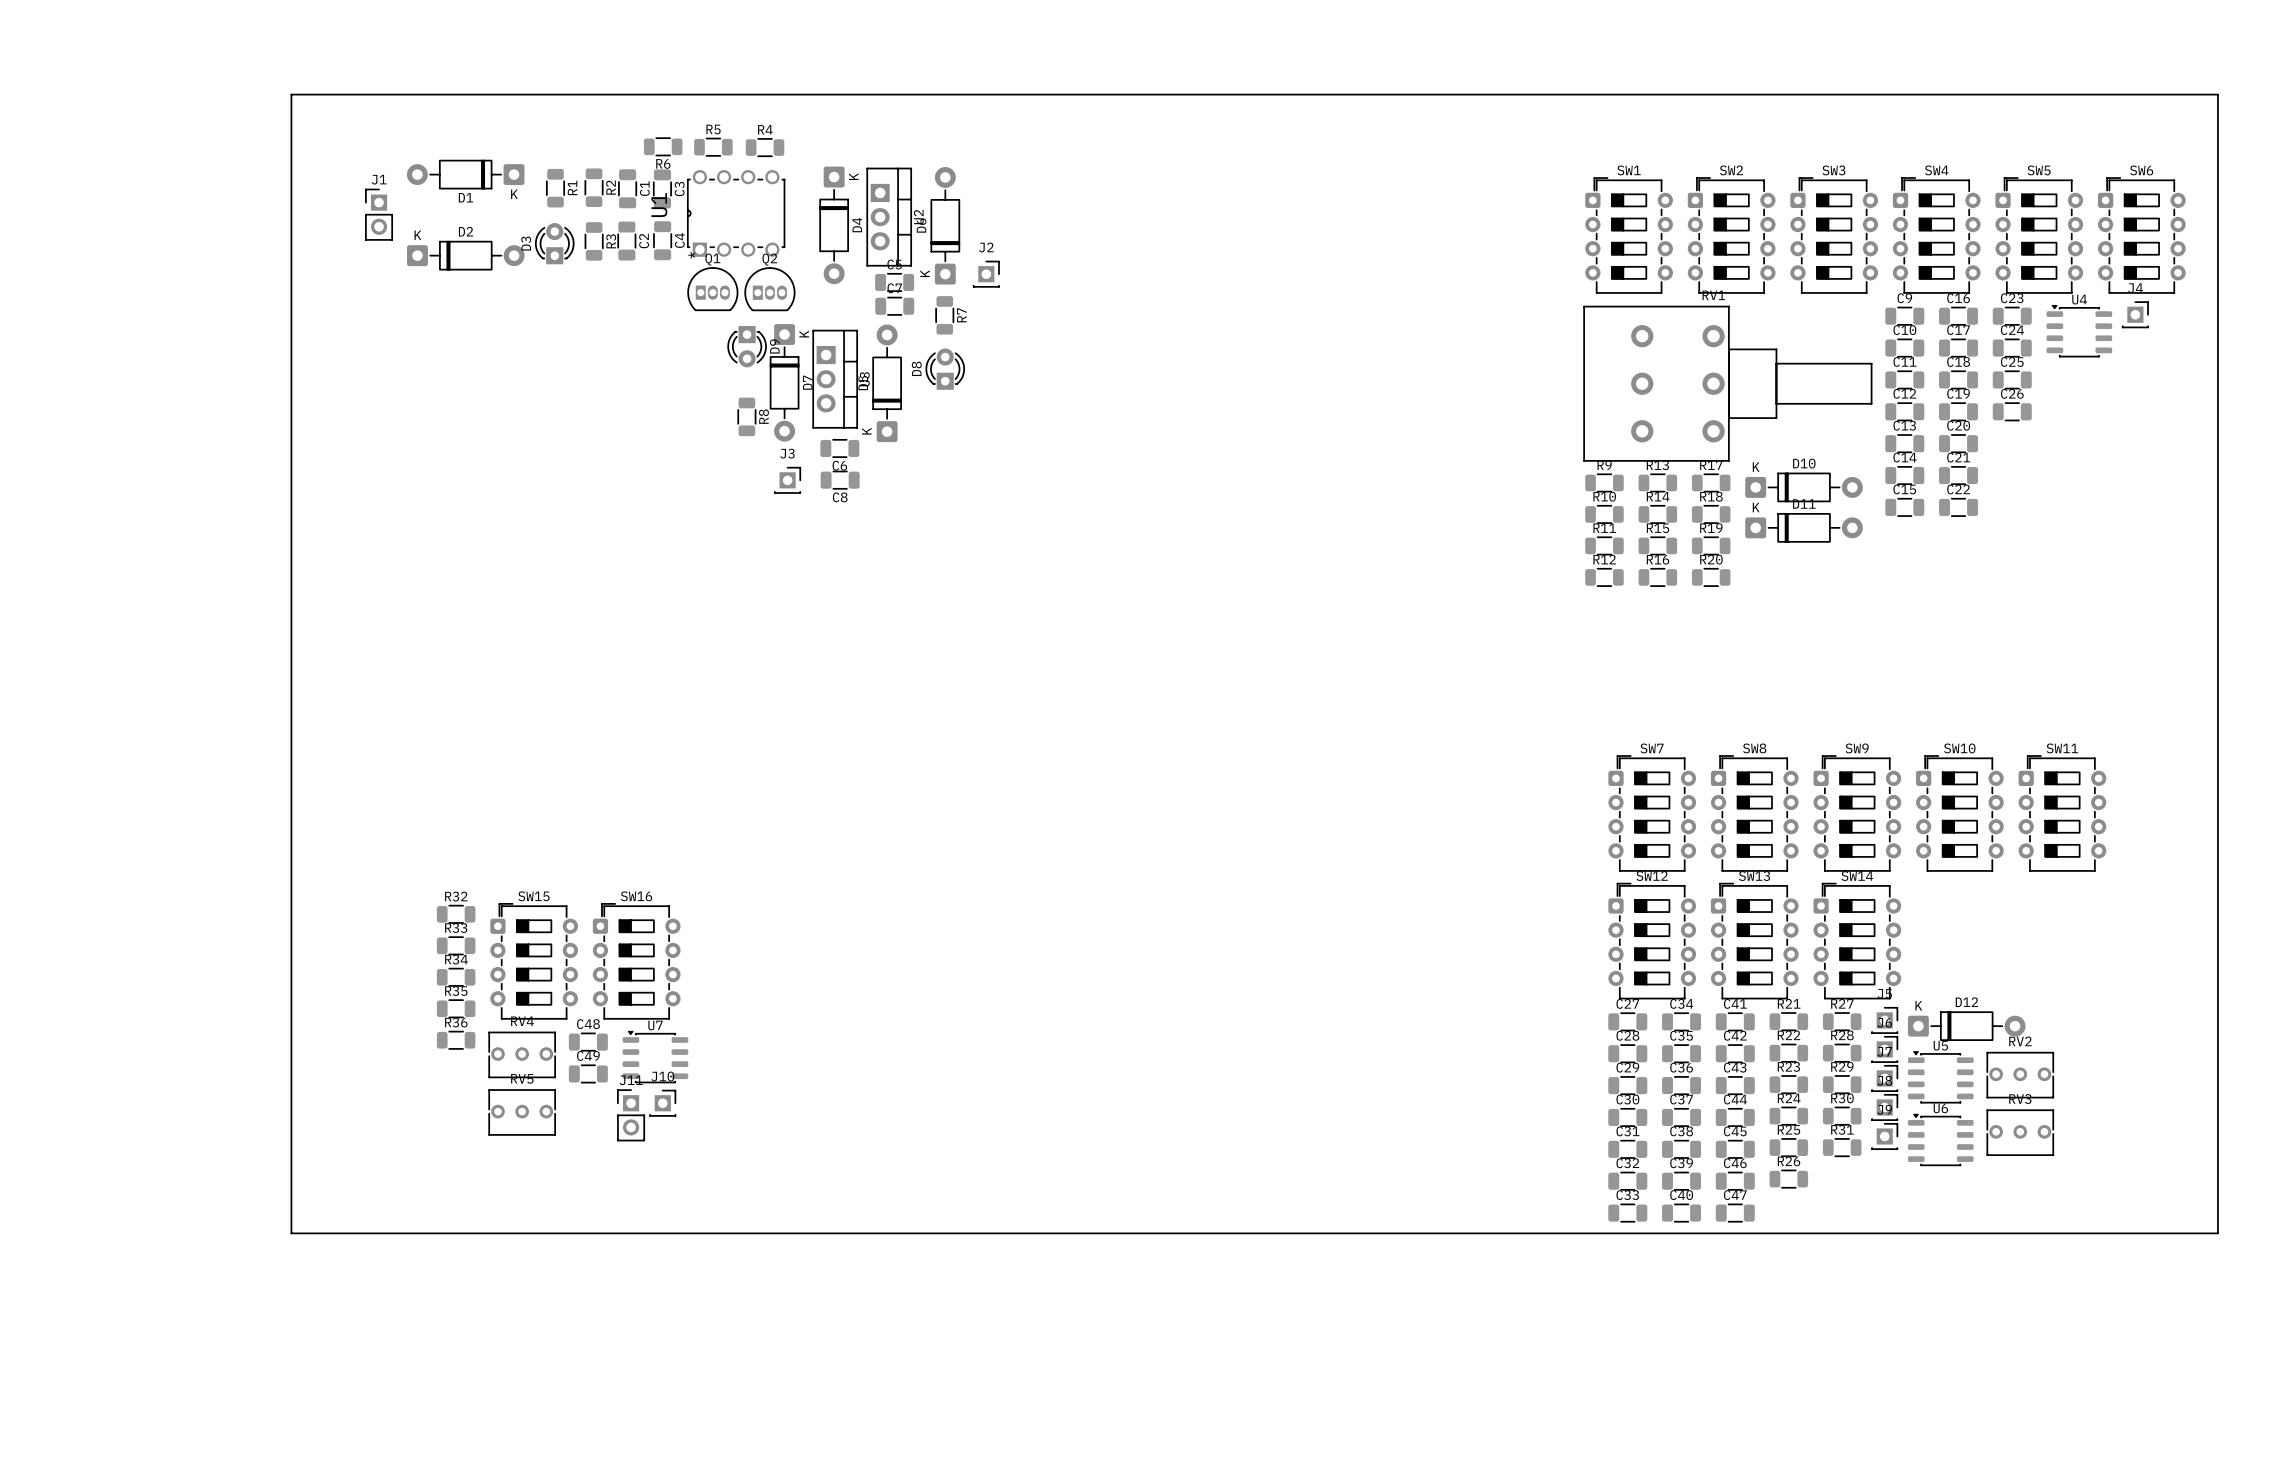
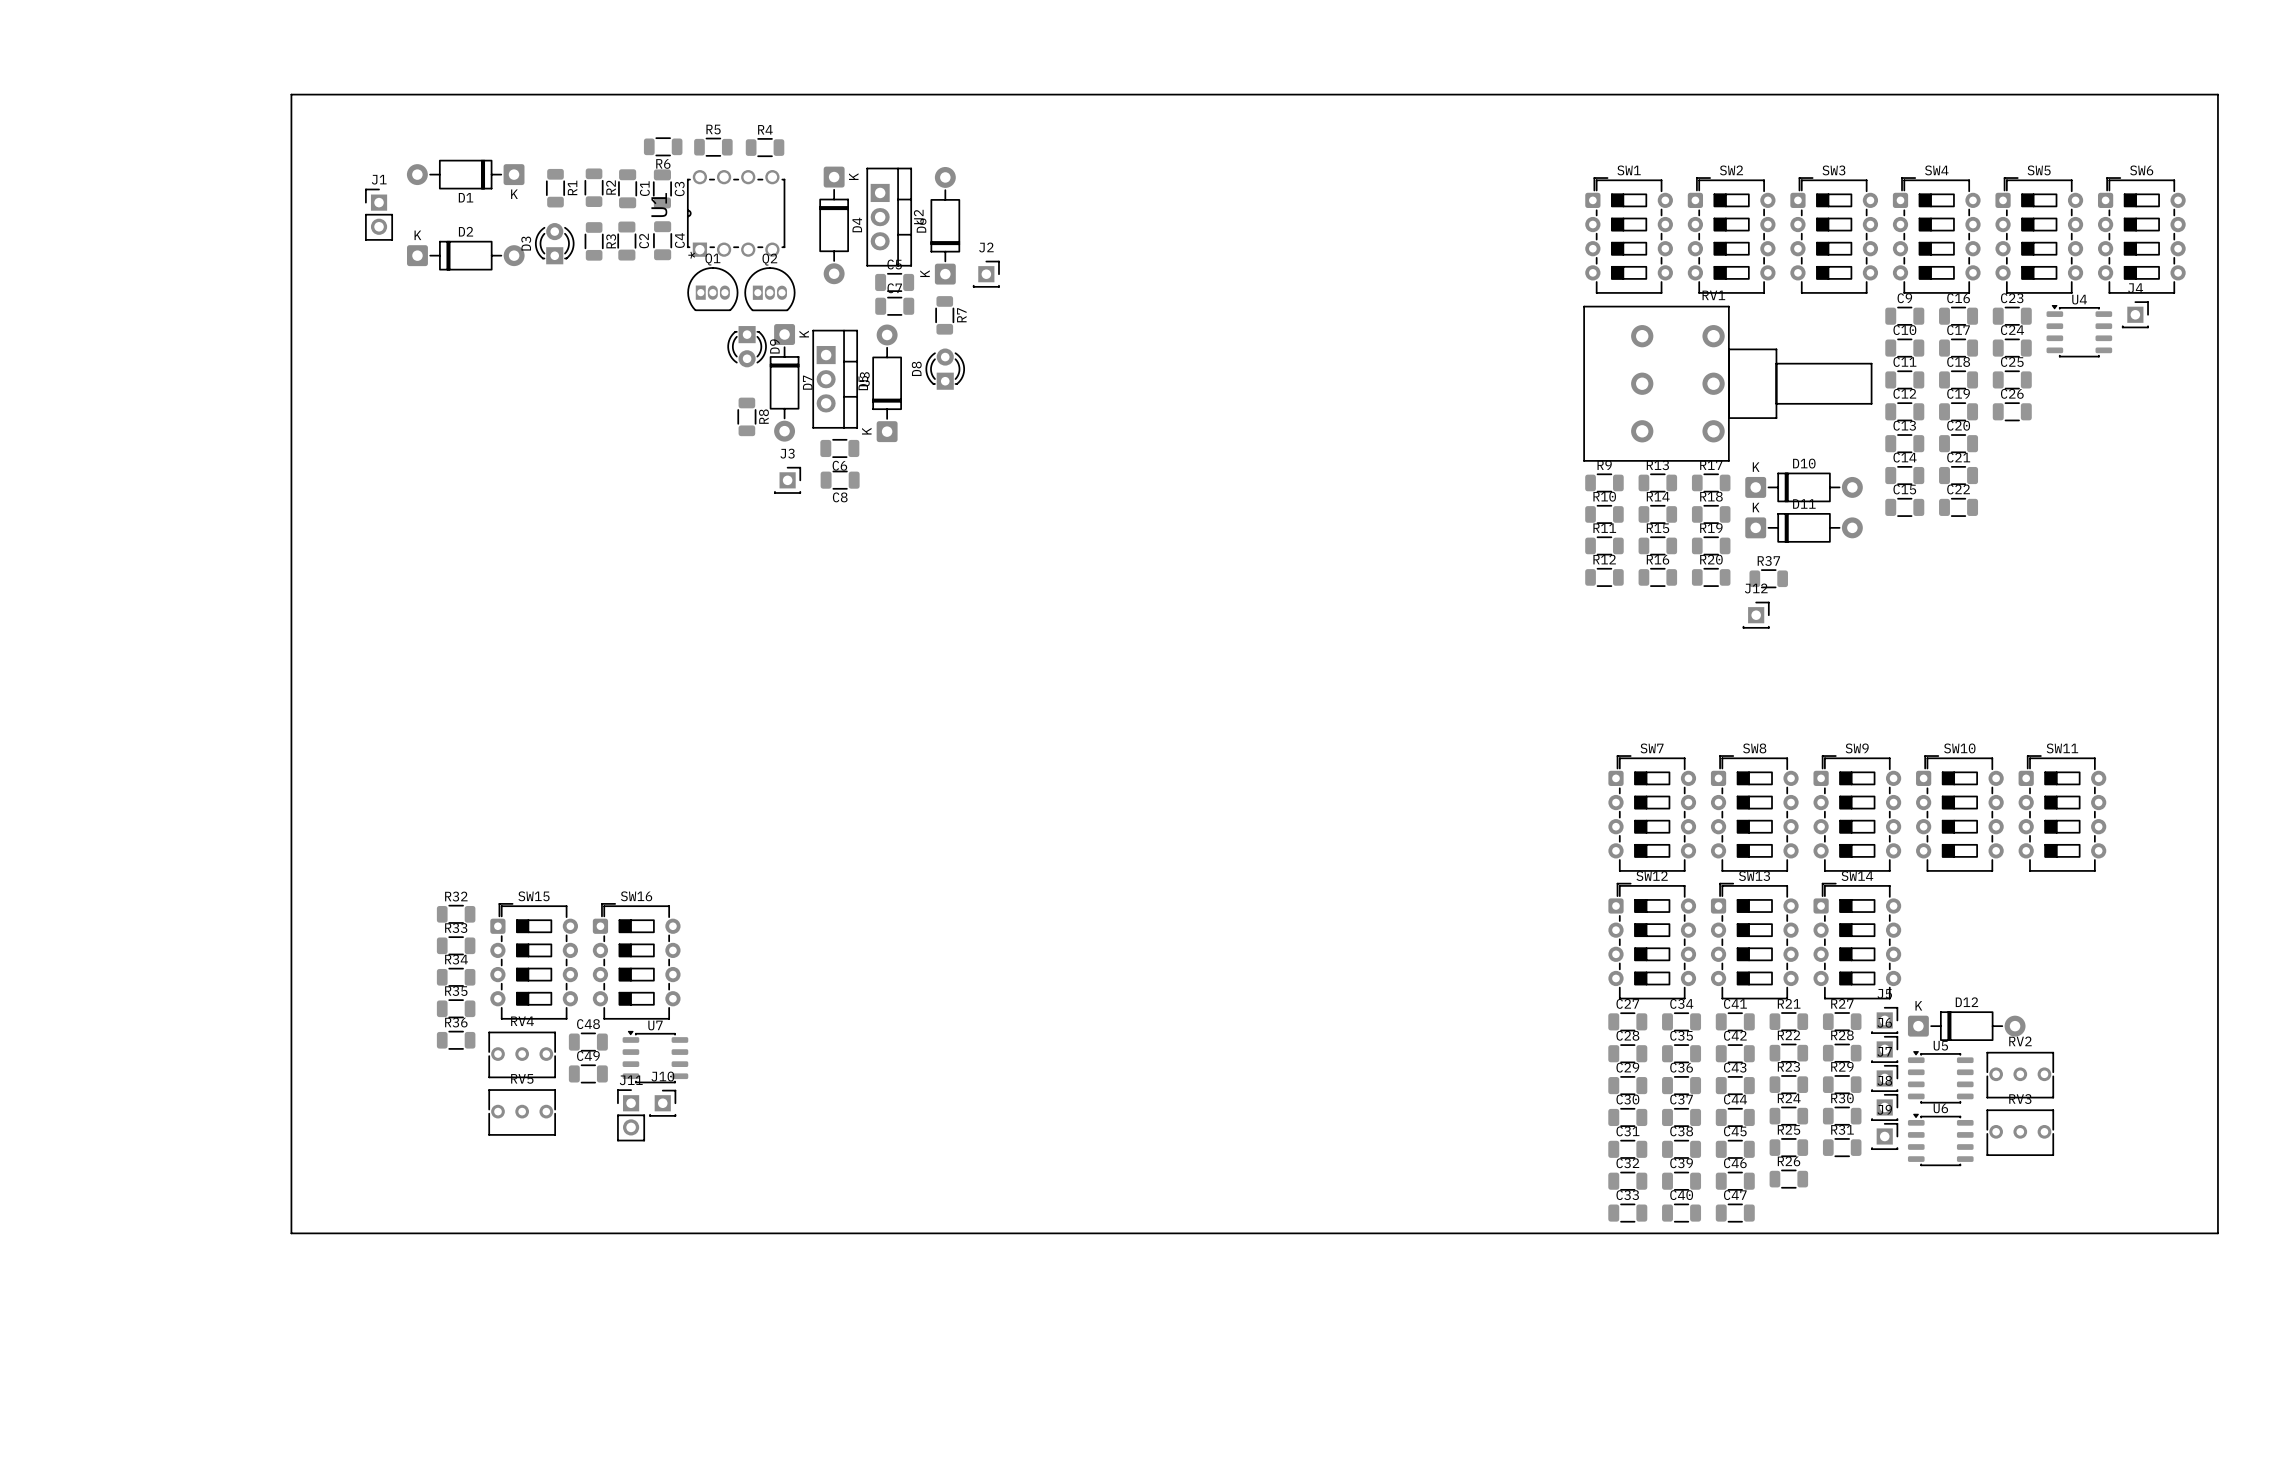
R37: none -> (1768, 578)
J12: none -> (1756, 615)

